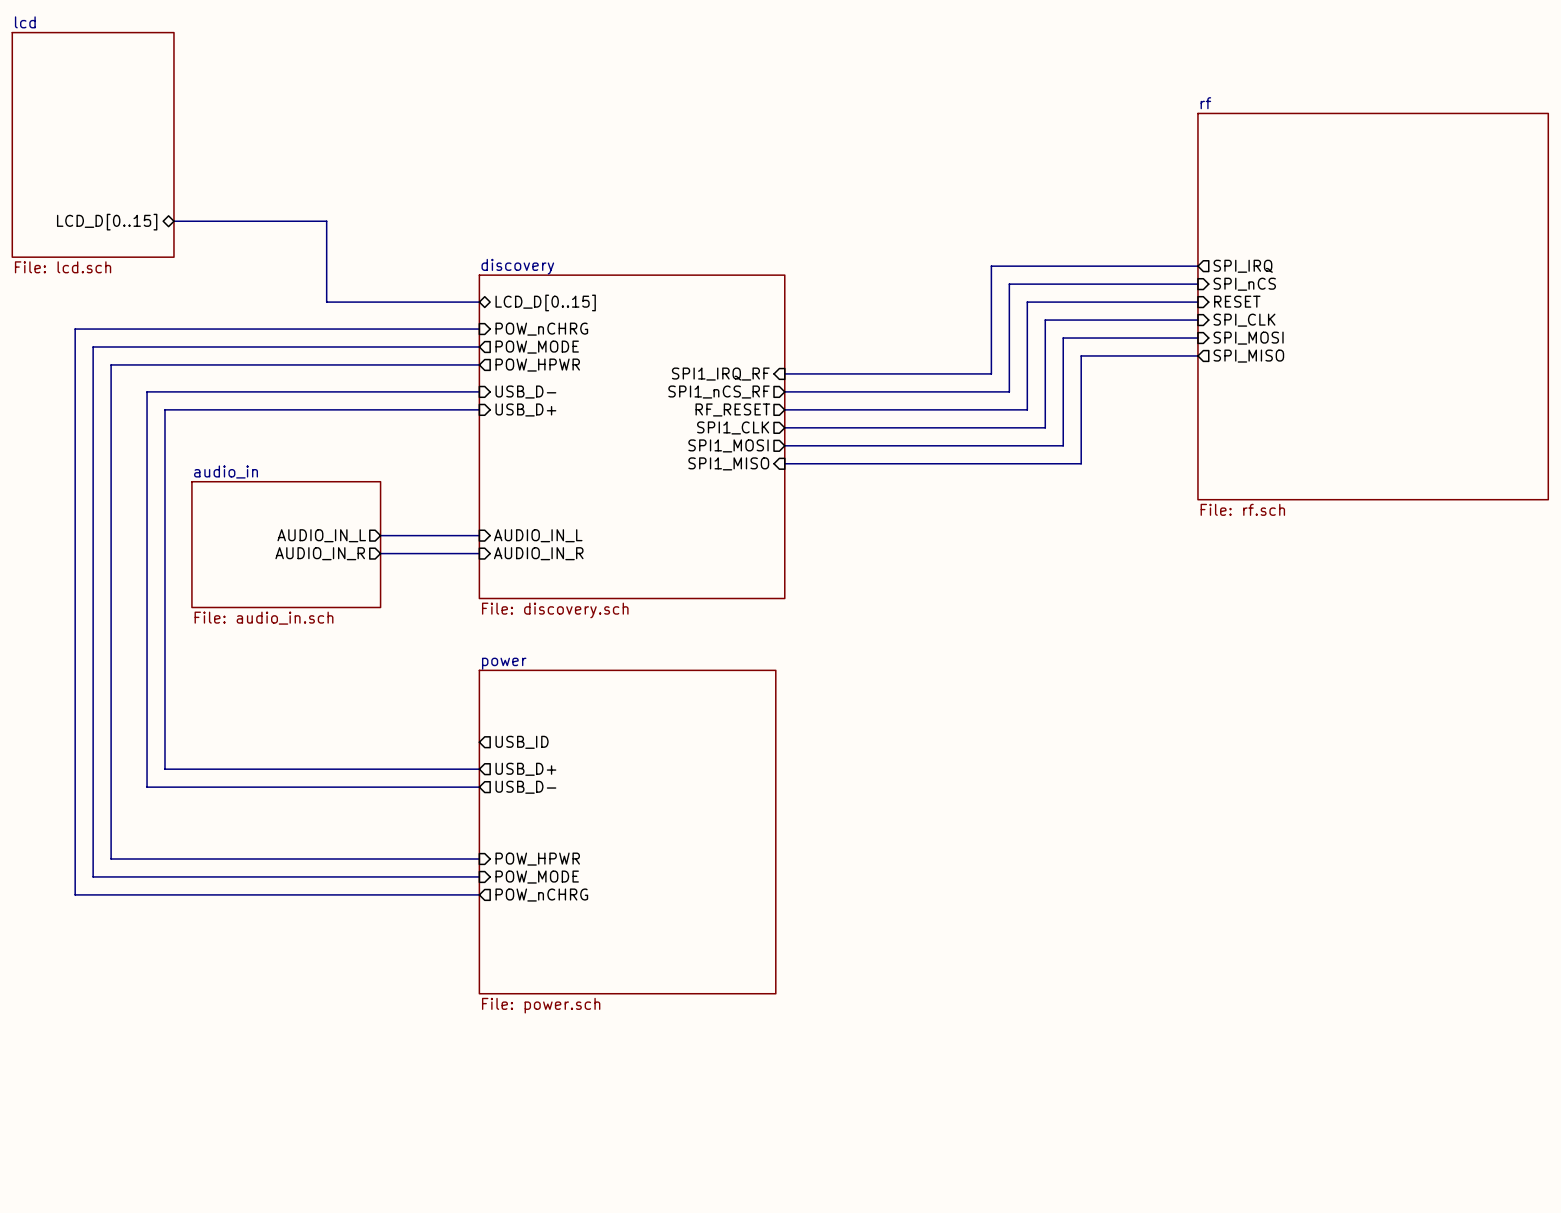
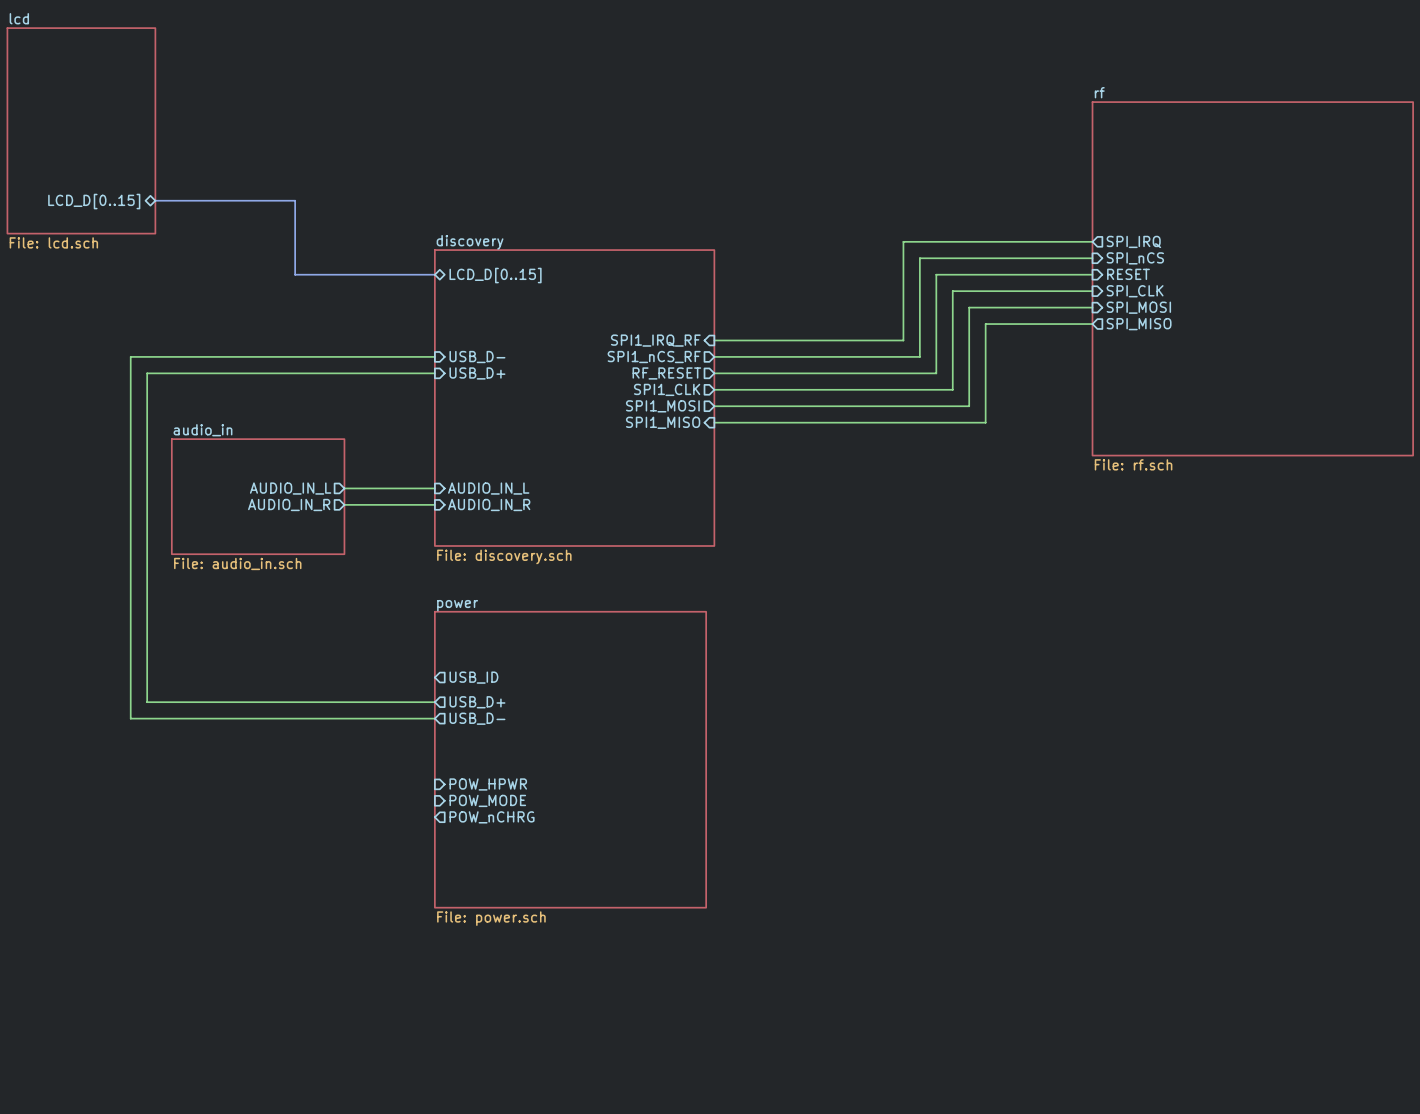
wire: (479, 329) (75, 329) (75, 894) (479, 894) -> none
sheet pin: POW_nCHRG (541, 329) -> none
wire: (479, 346) (93, 346) (93, 876) (479, 876) -> none
sheet pin: POW_MODE (537, 347) -> none
wire: (479, 364) (111, 364) (111, 858) (479, 858) -> none
sheet pin: POW_HPWR (537, 365) -> none

